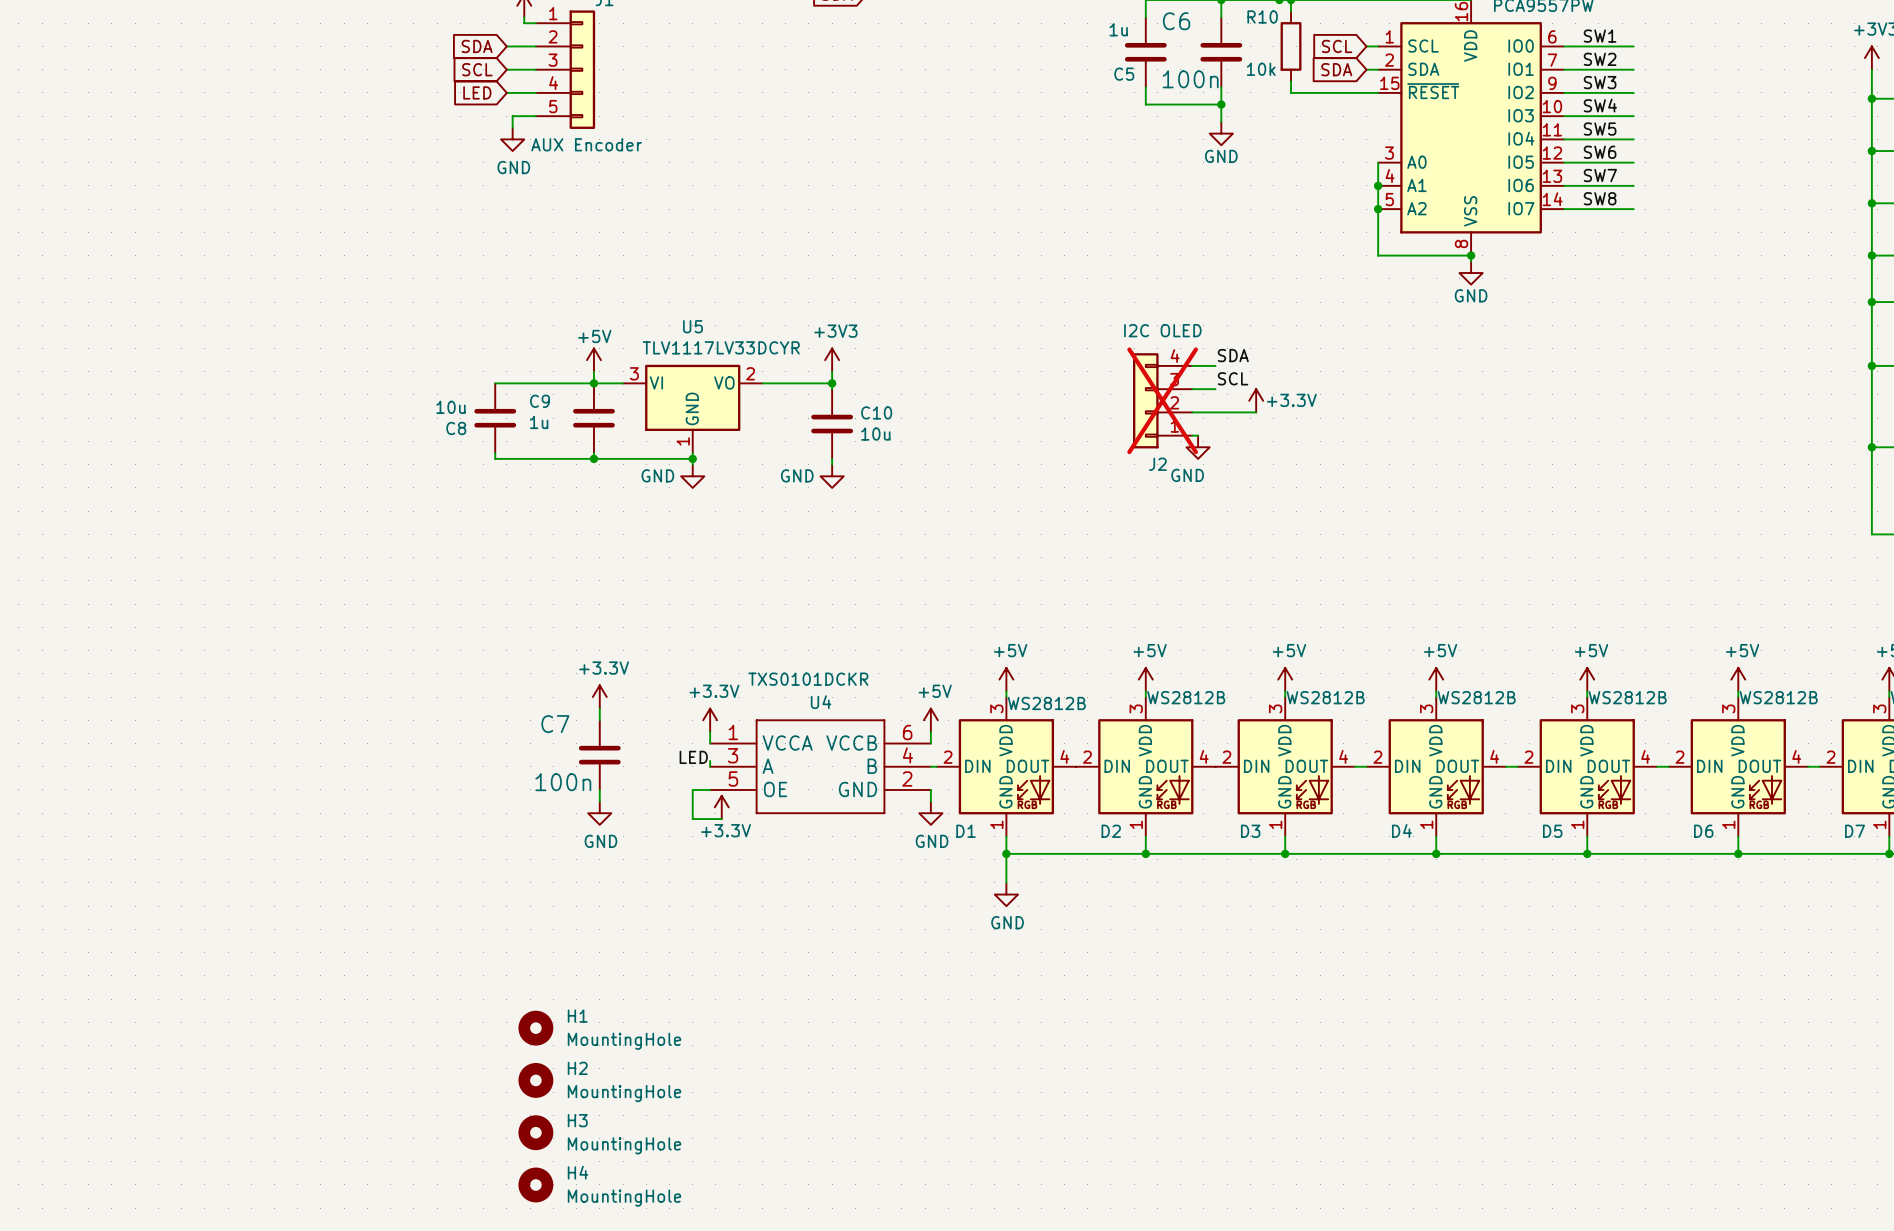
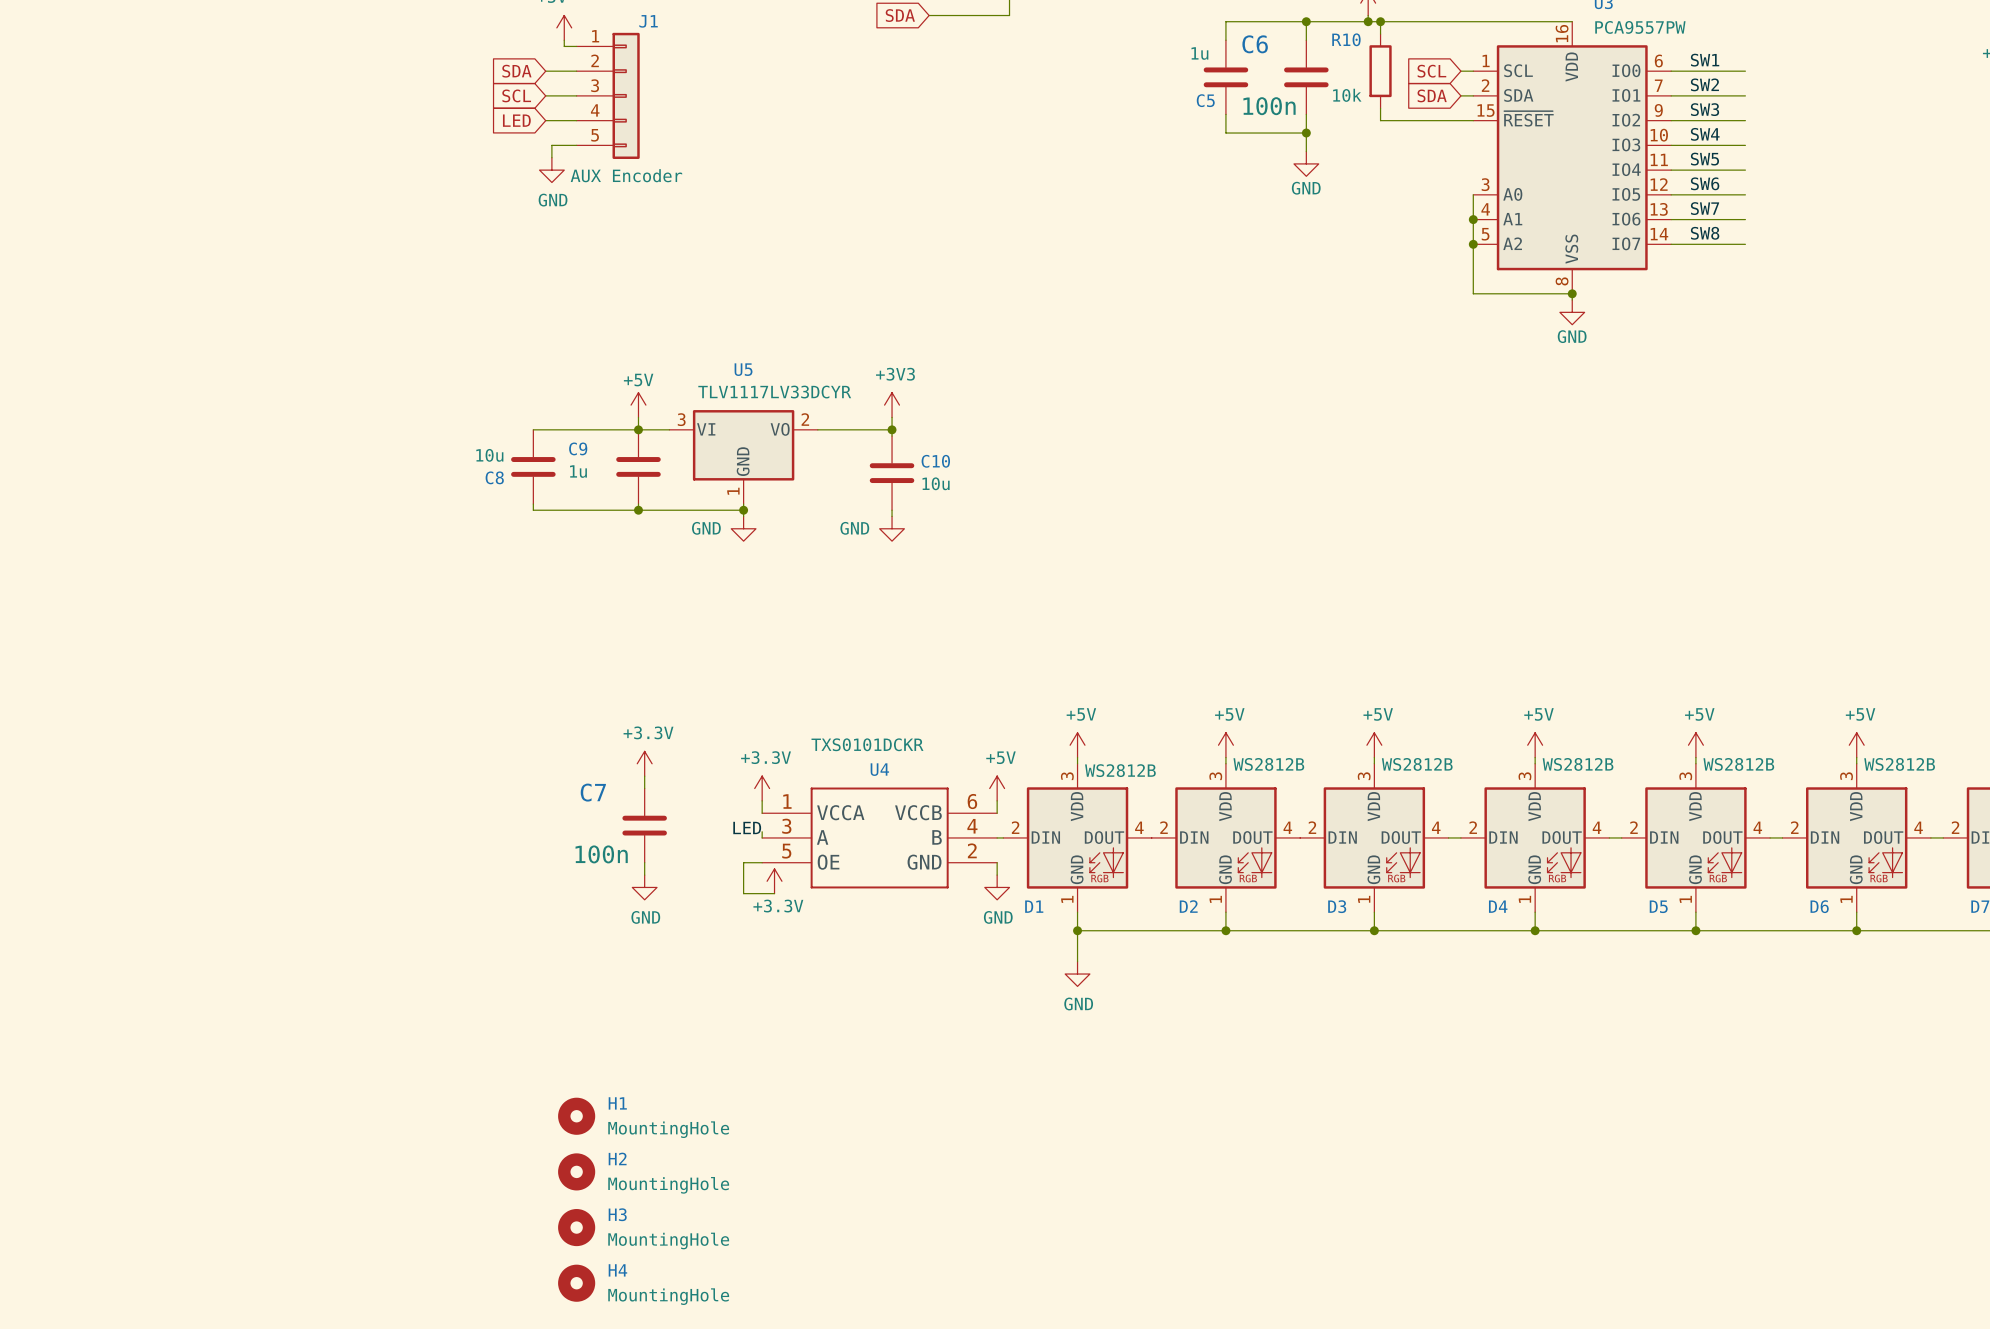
label: SDA (1233, 355) -> none
wire: (1192, 365) (1215, 365) -> none
label: SCL (1233, 378) -> none
wire: (1192, 389) (1215, 389) -> none
J2: I2C OLED (1162, 400) -> none
power symbol: +3.3V (1256, 400) -> none
wire: (1192, 412) (1256, 412) -> none
wire: (1192, 435) (1198, 435) -> none
power symbol: GND (1198, 447) -> none

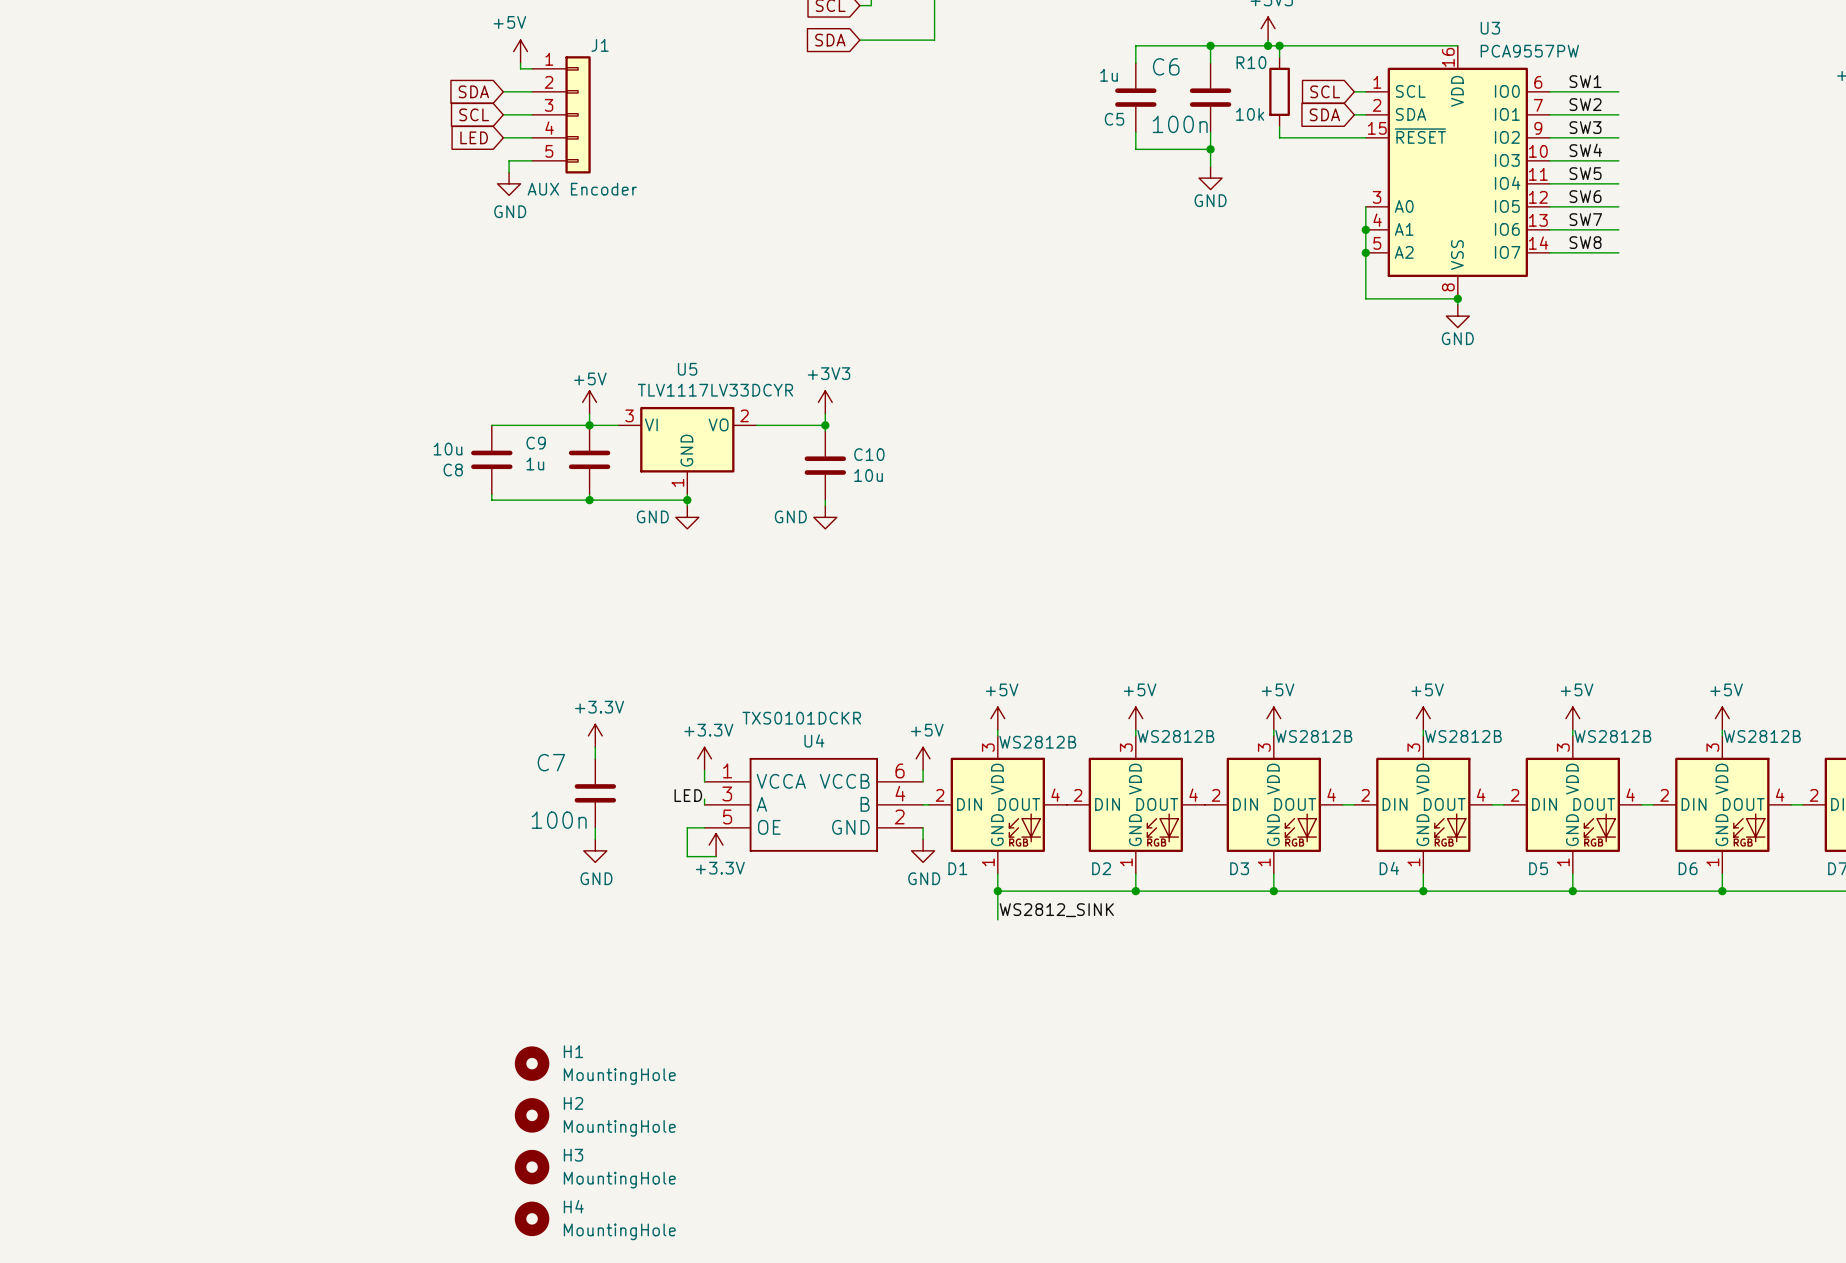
label: none -> WS2812_SINK (1056, 910)
power symbol: GND (1077, 974) -> none

